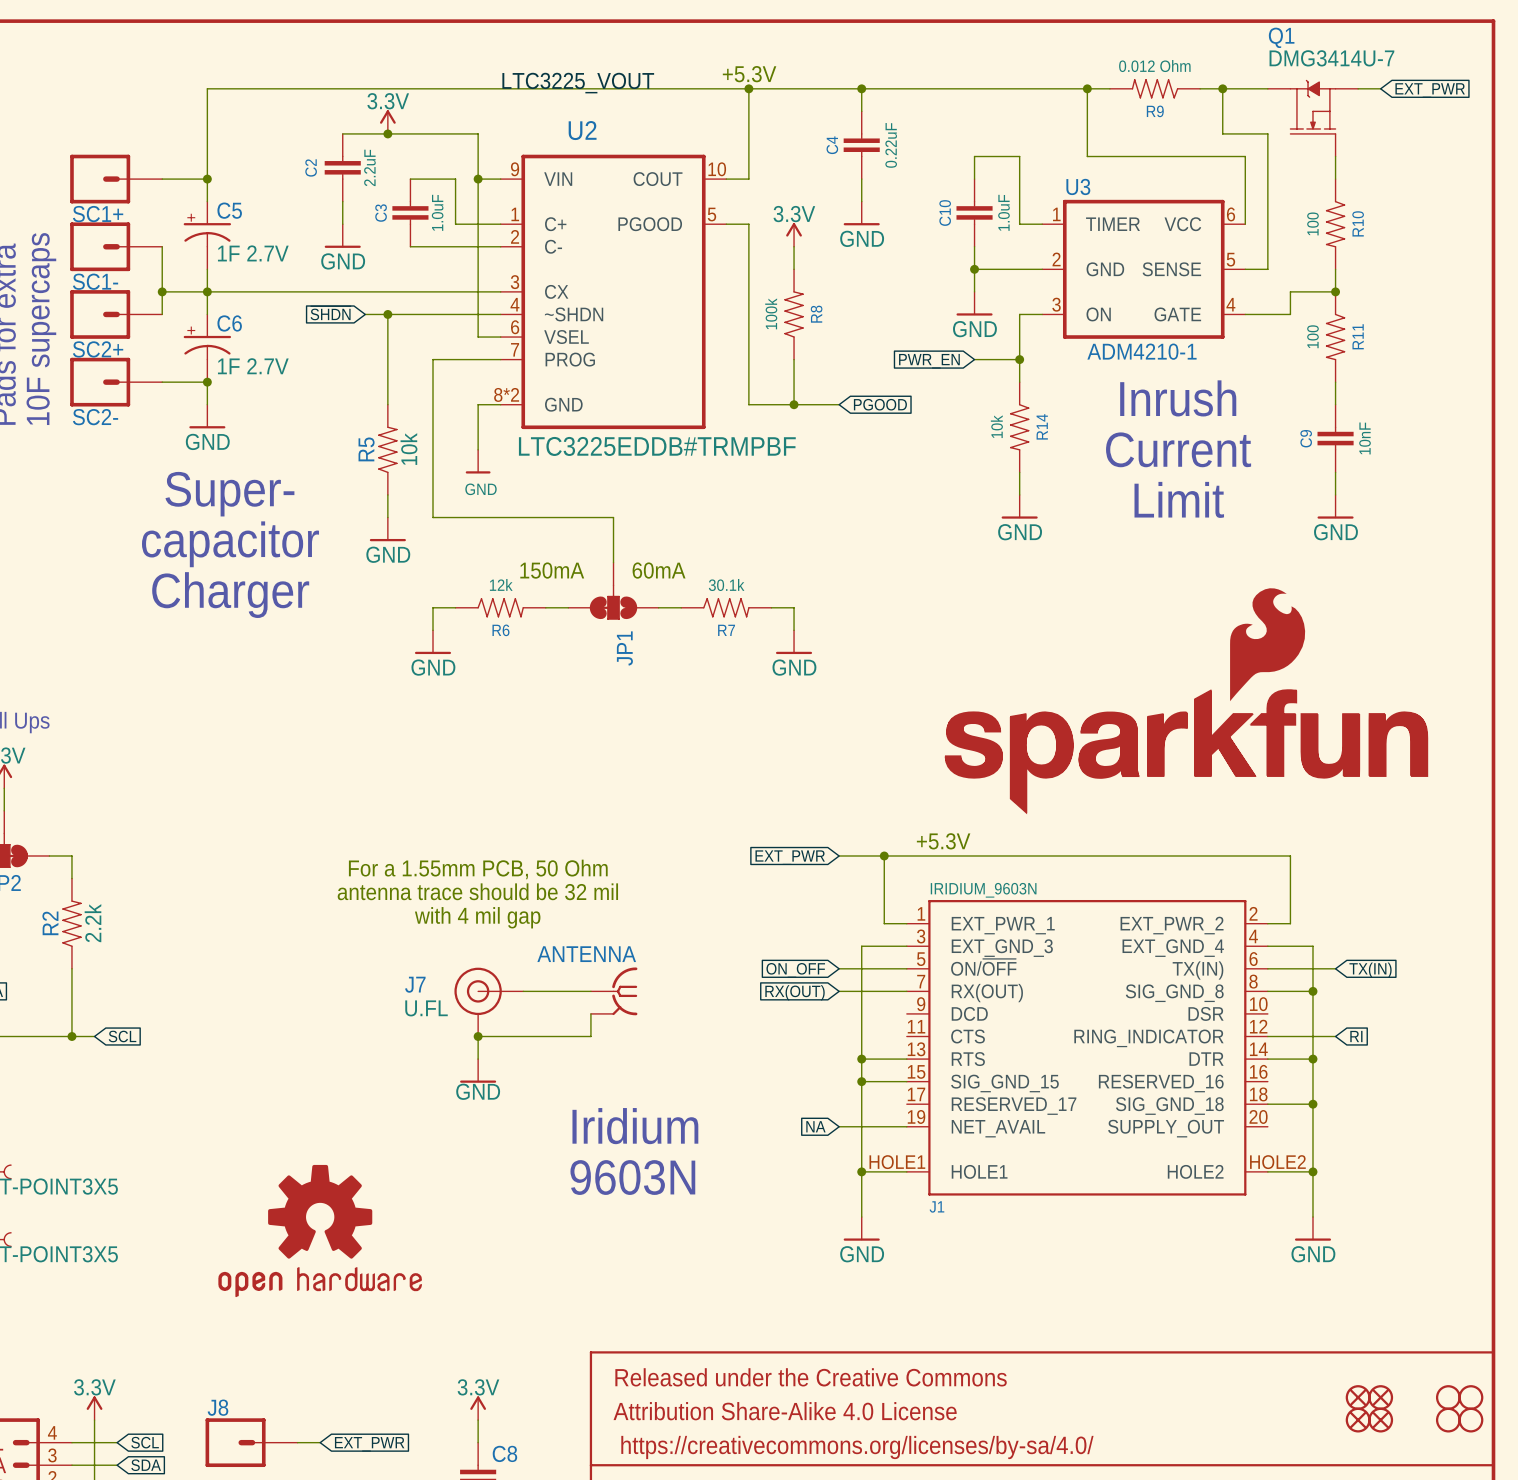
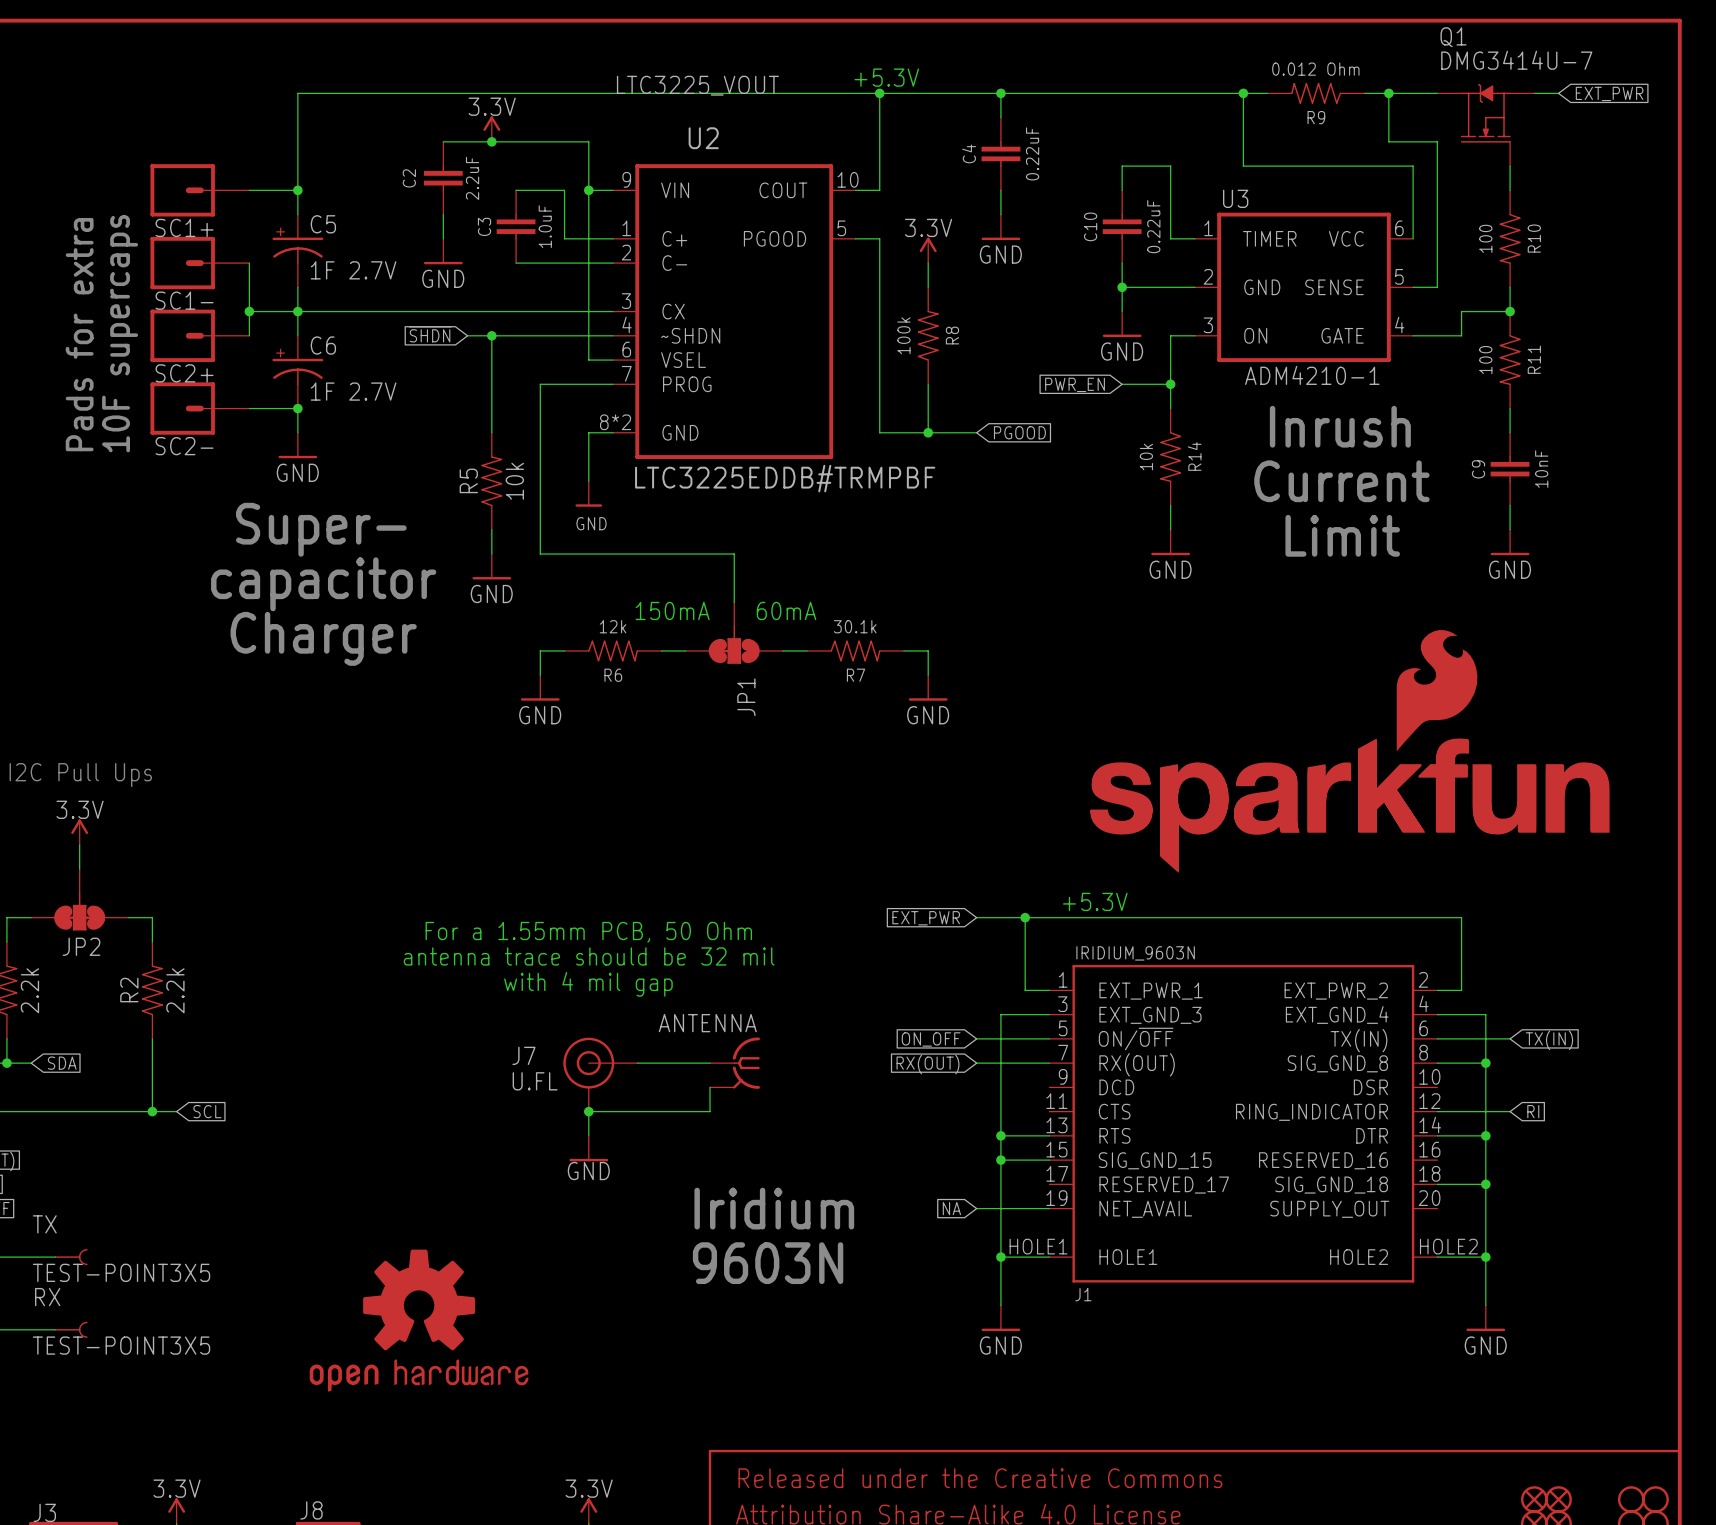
C10 value: 1.0uF (1003, 212) -> 0.22uF (1153, 226)

